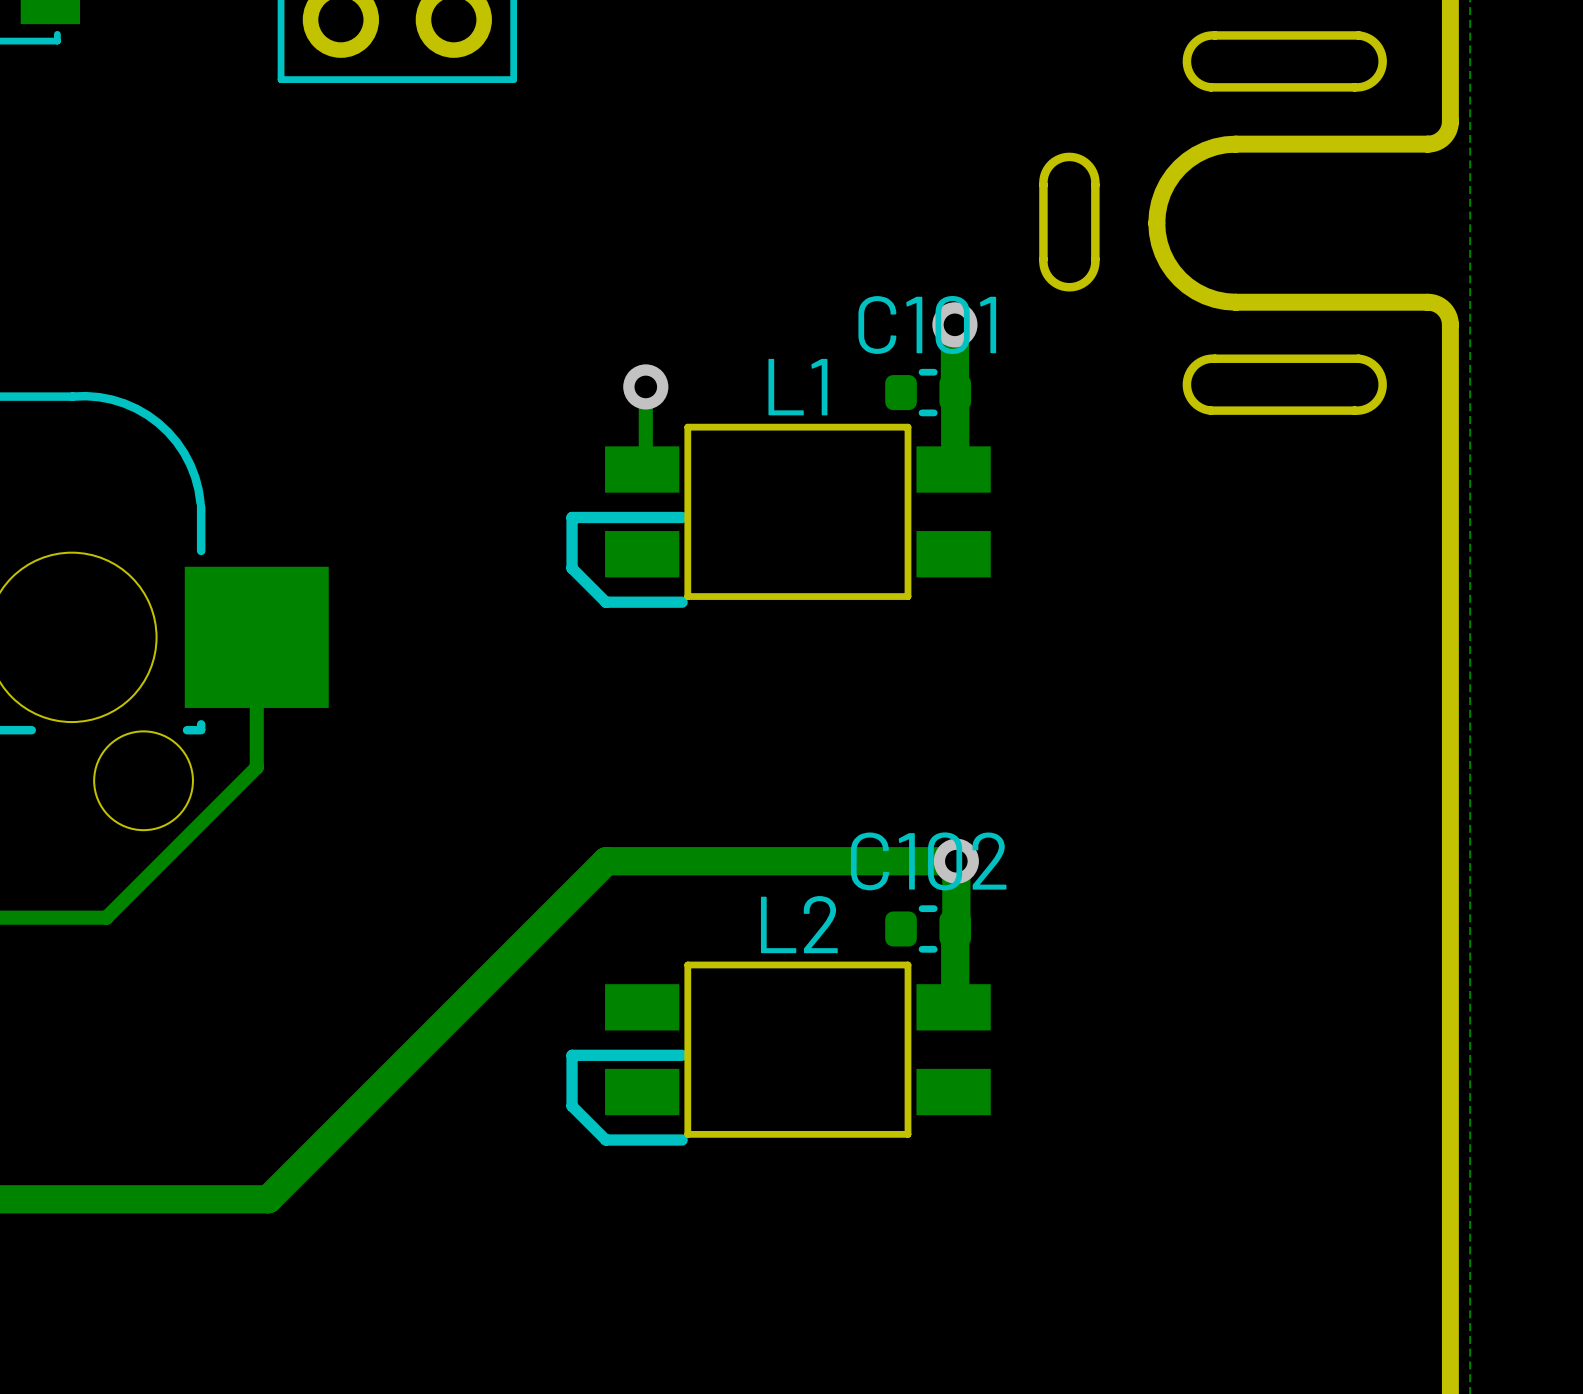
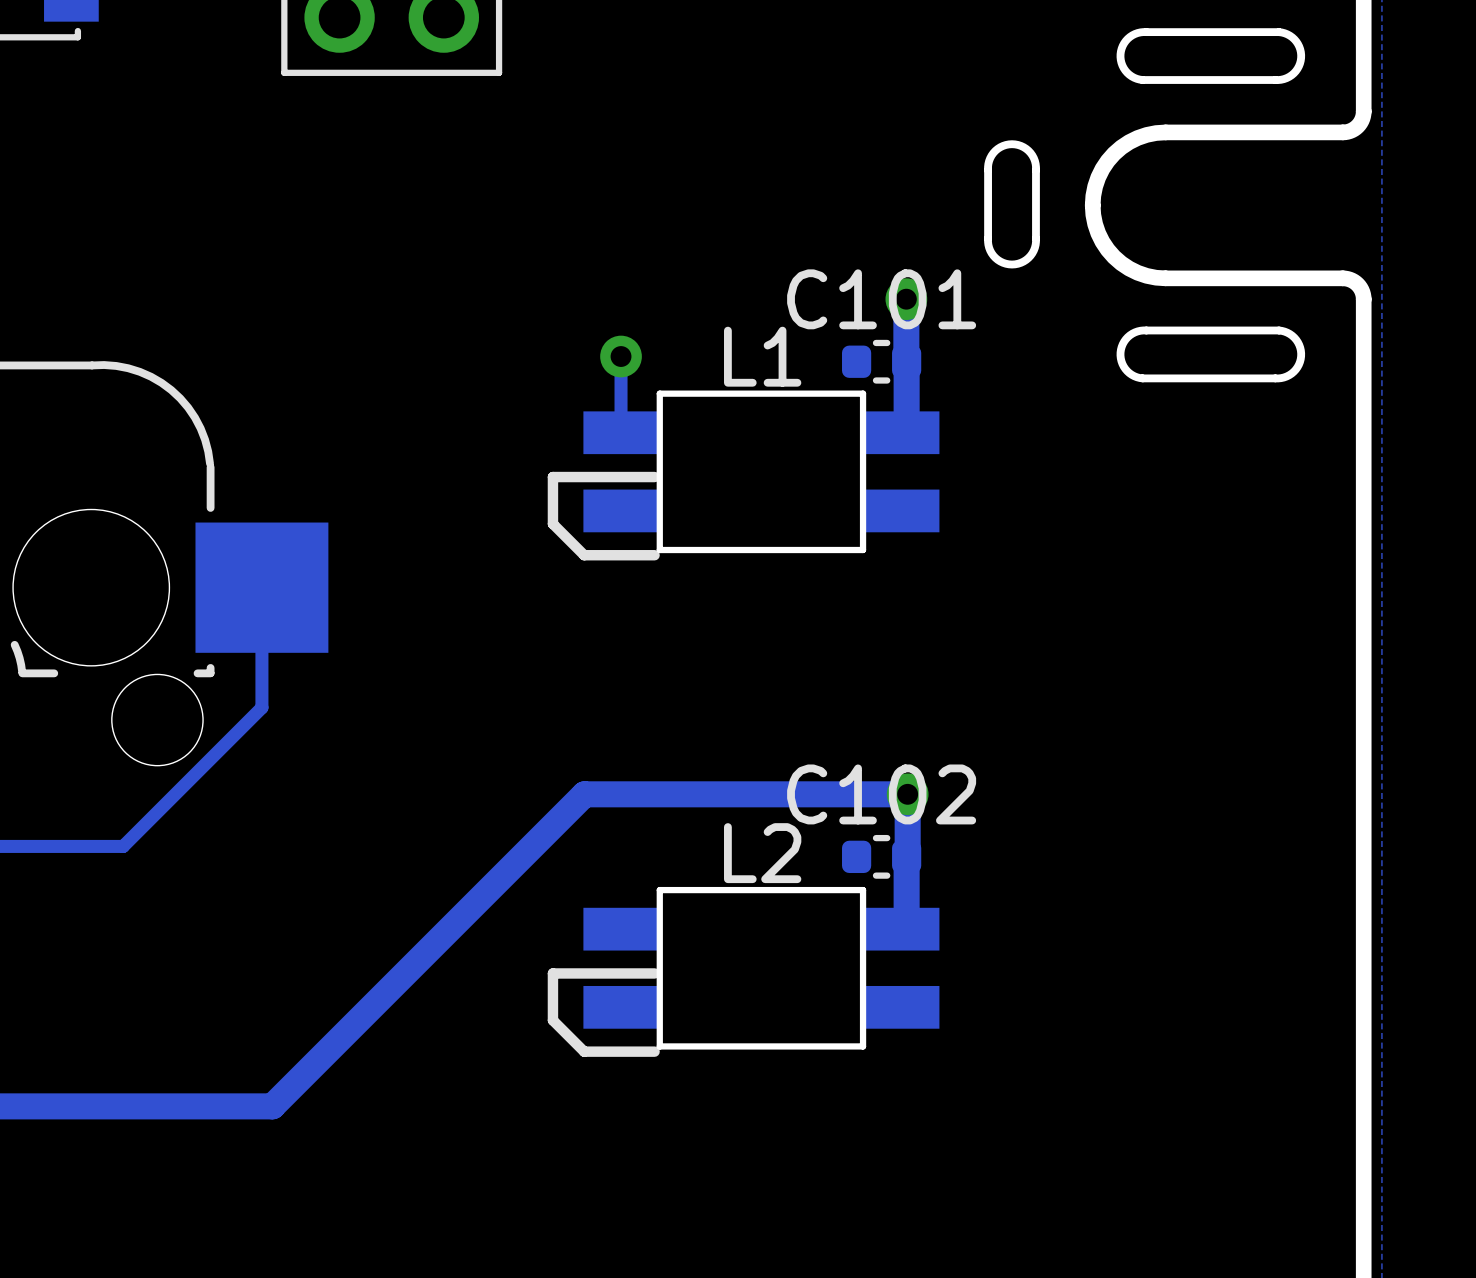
L1 footprint: [566, 423, 991, 608] -> [547, 390, 940, 561]
L2 footprint: [566, 961, 991, 1146] -> [547, 886, 940, 1057]

